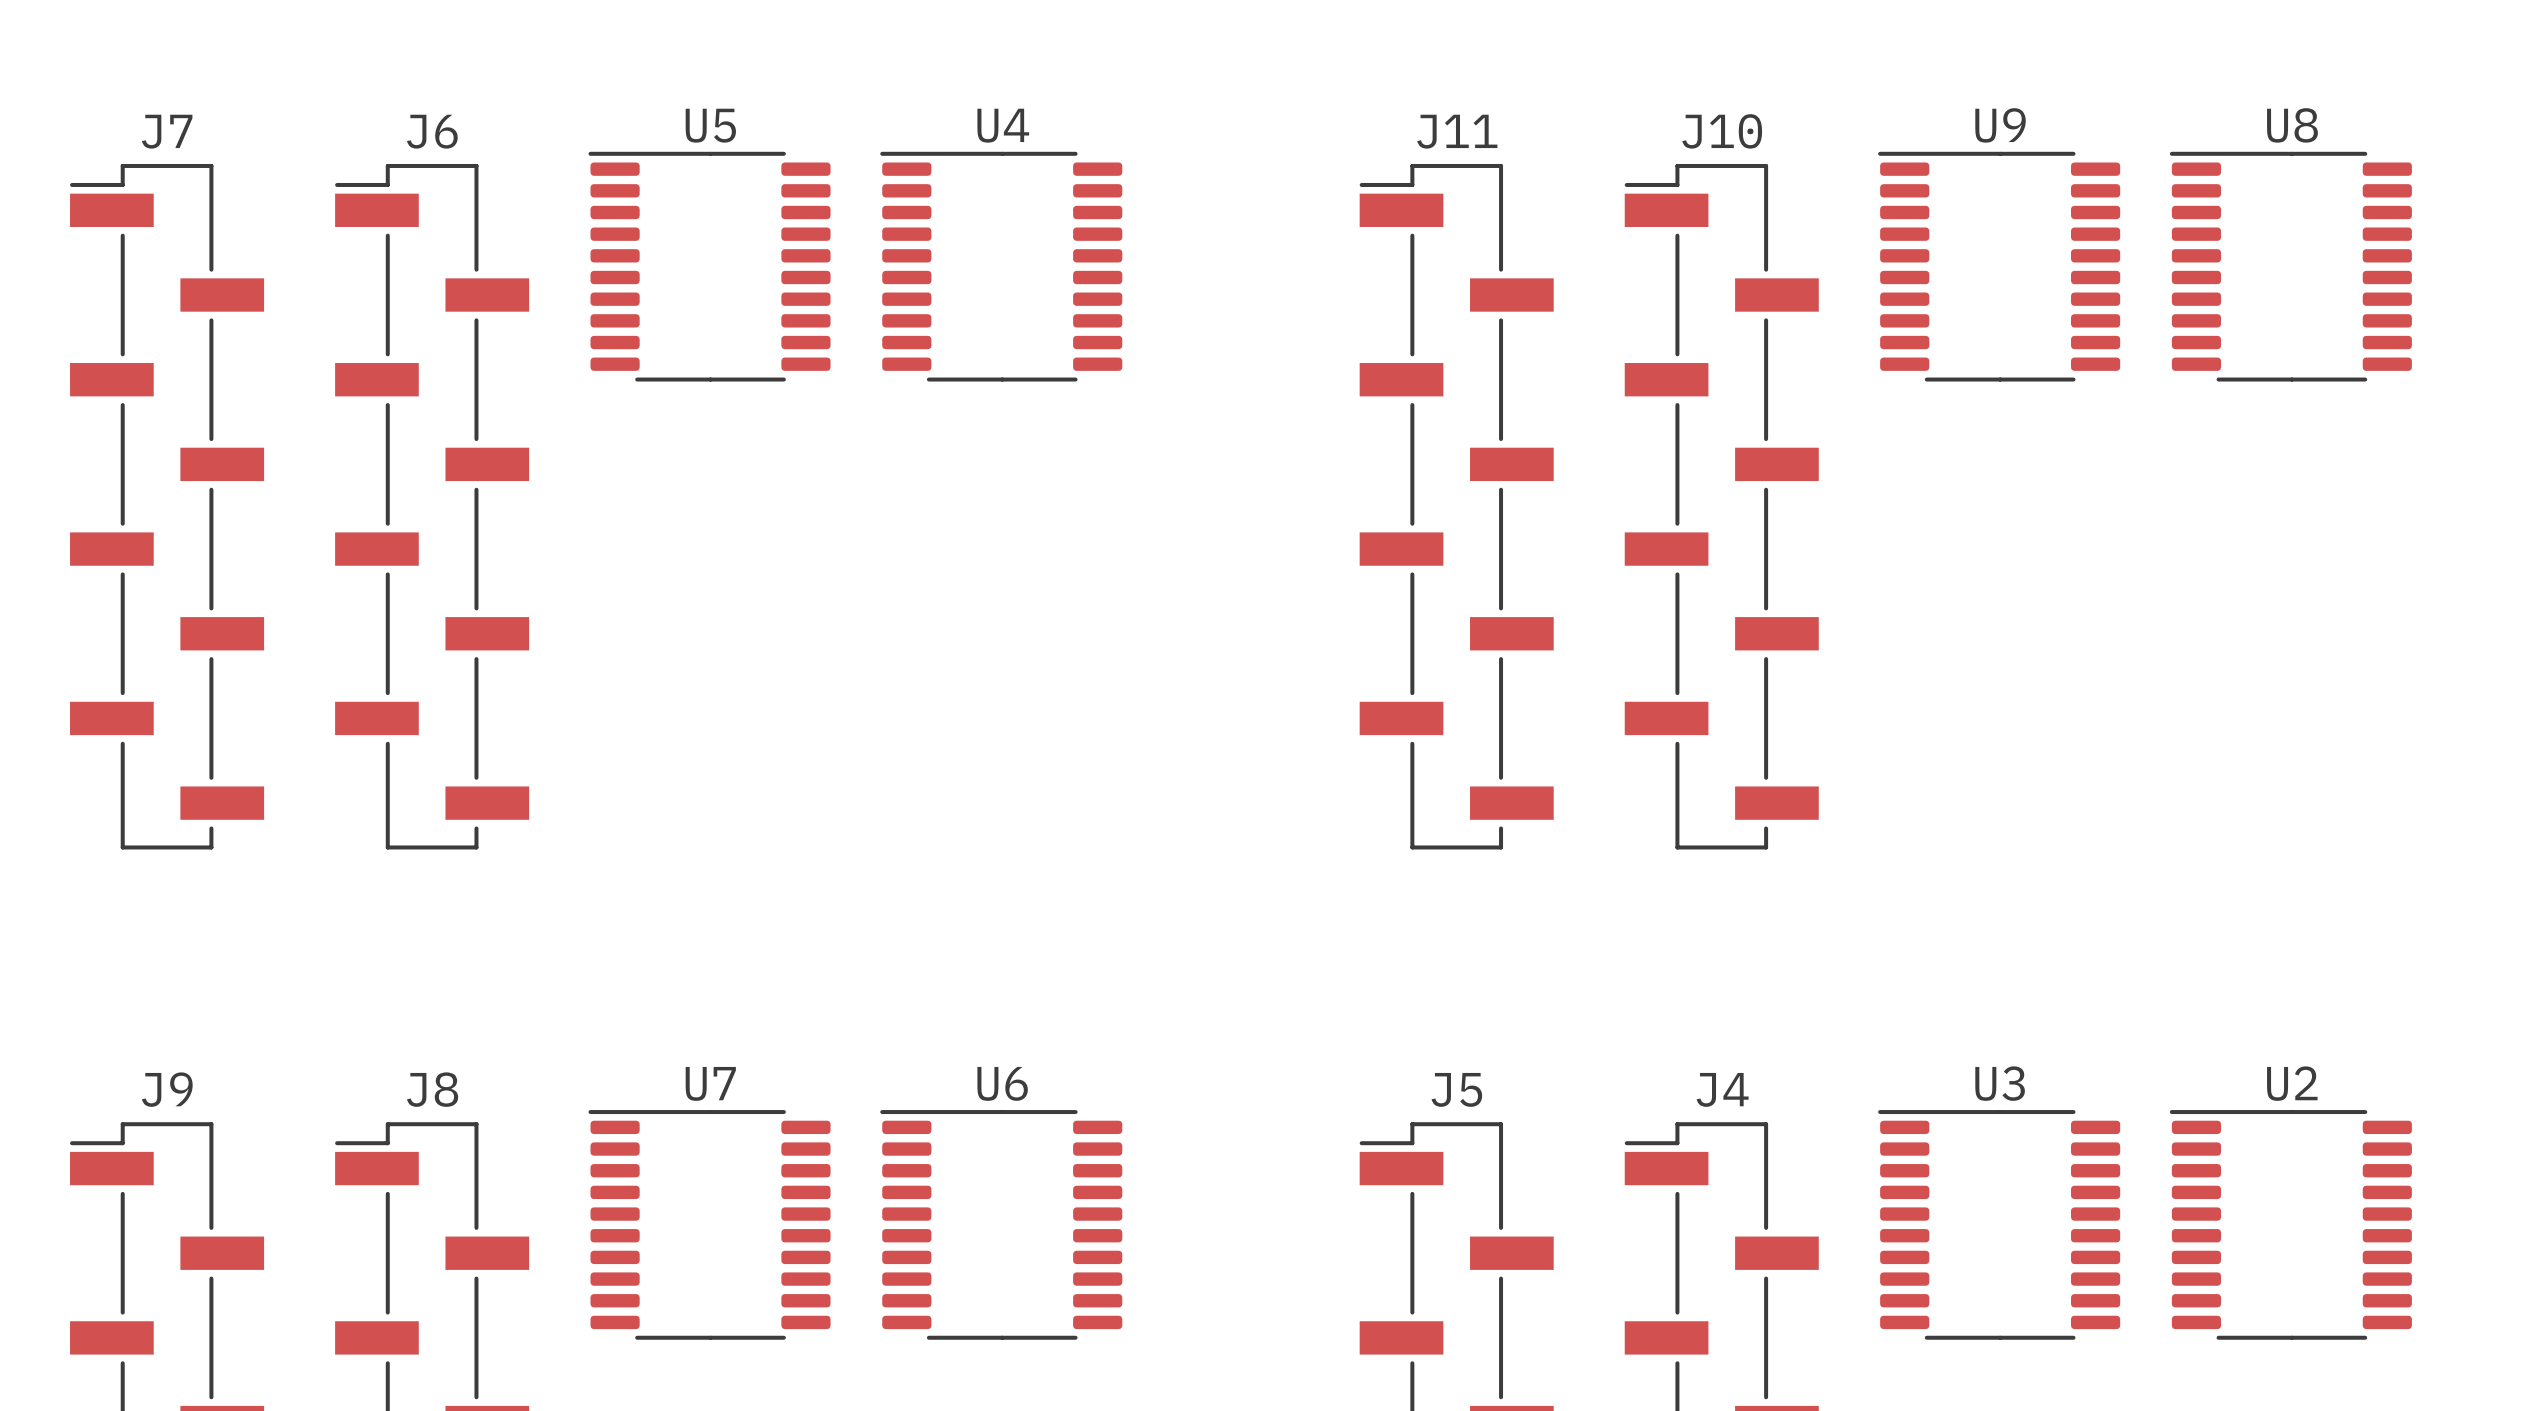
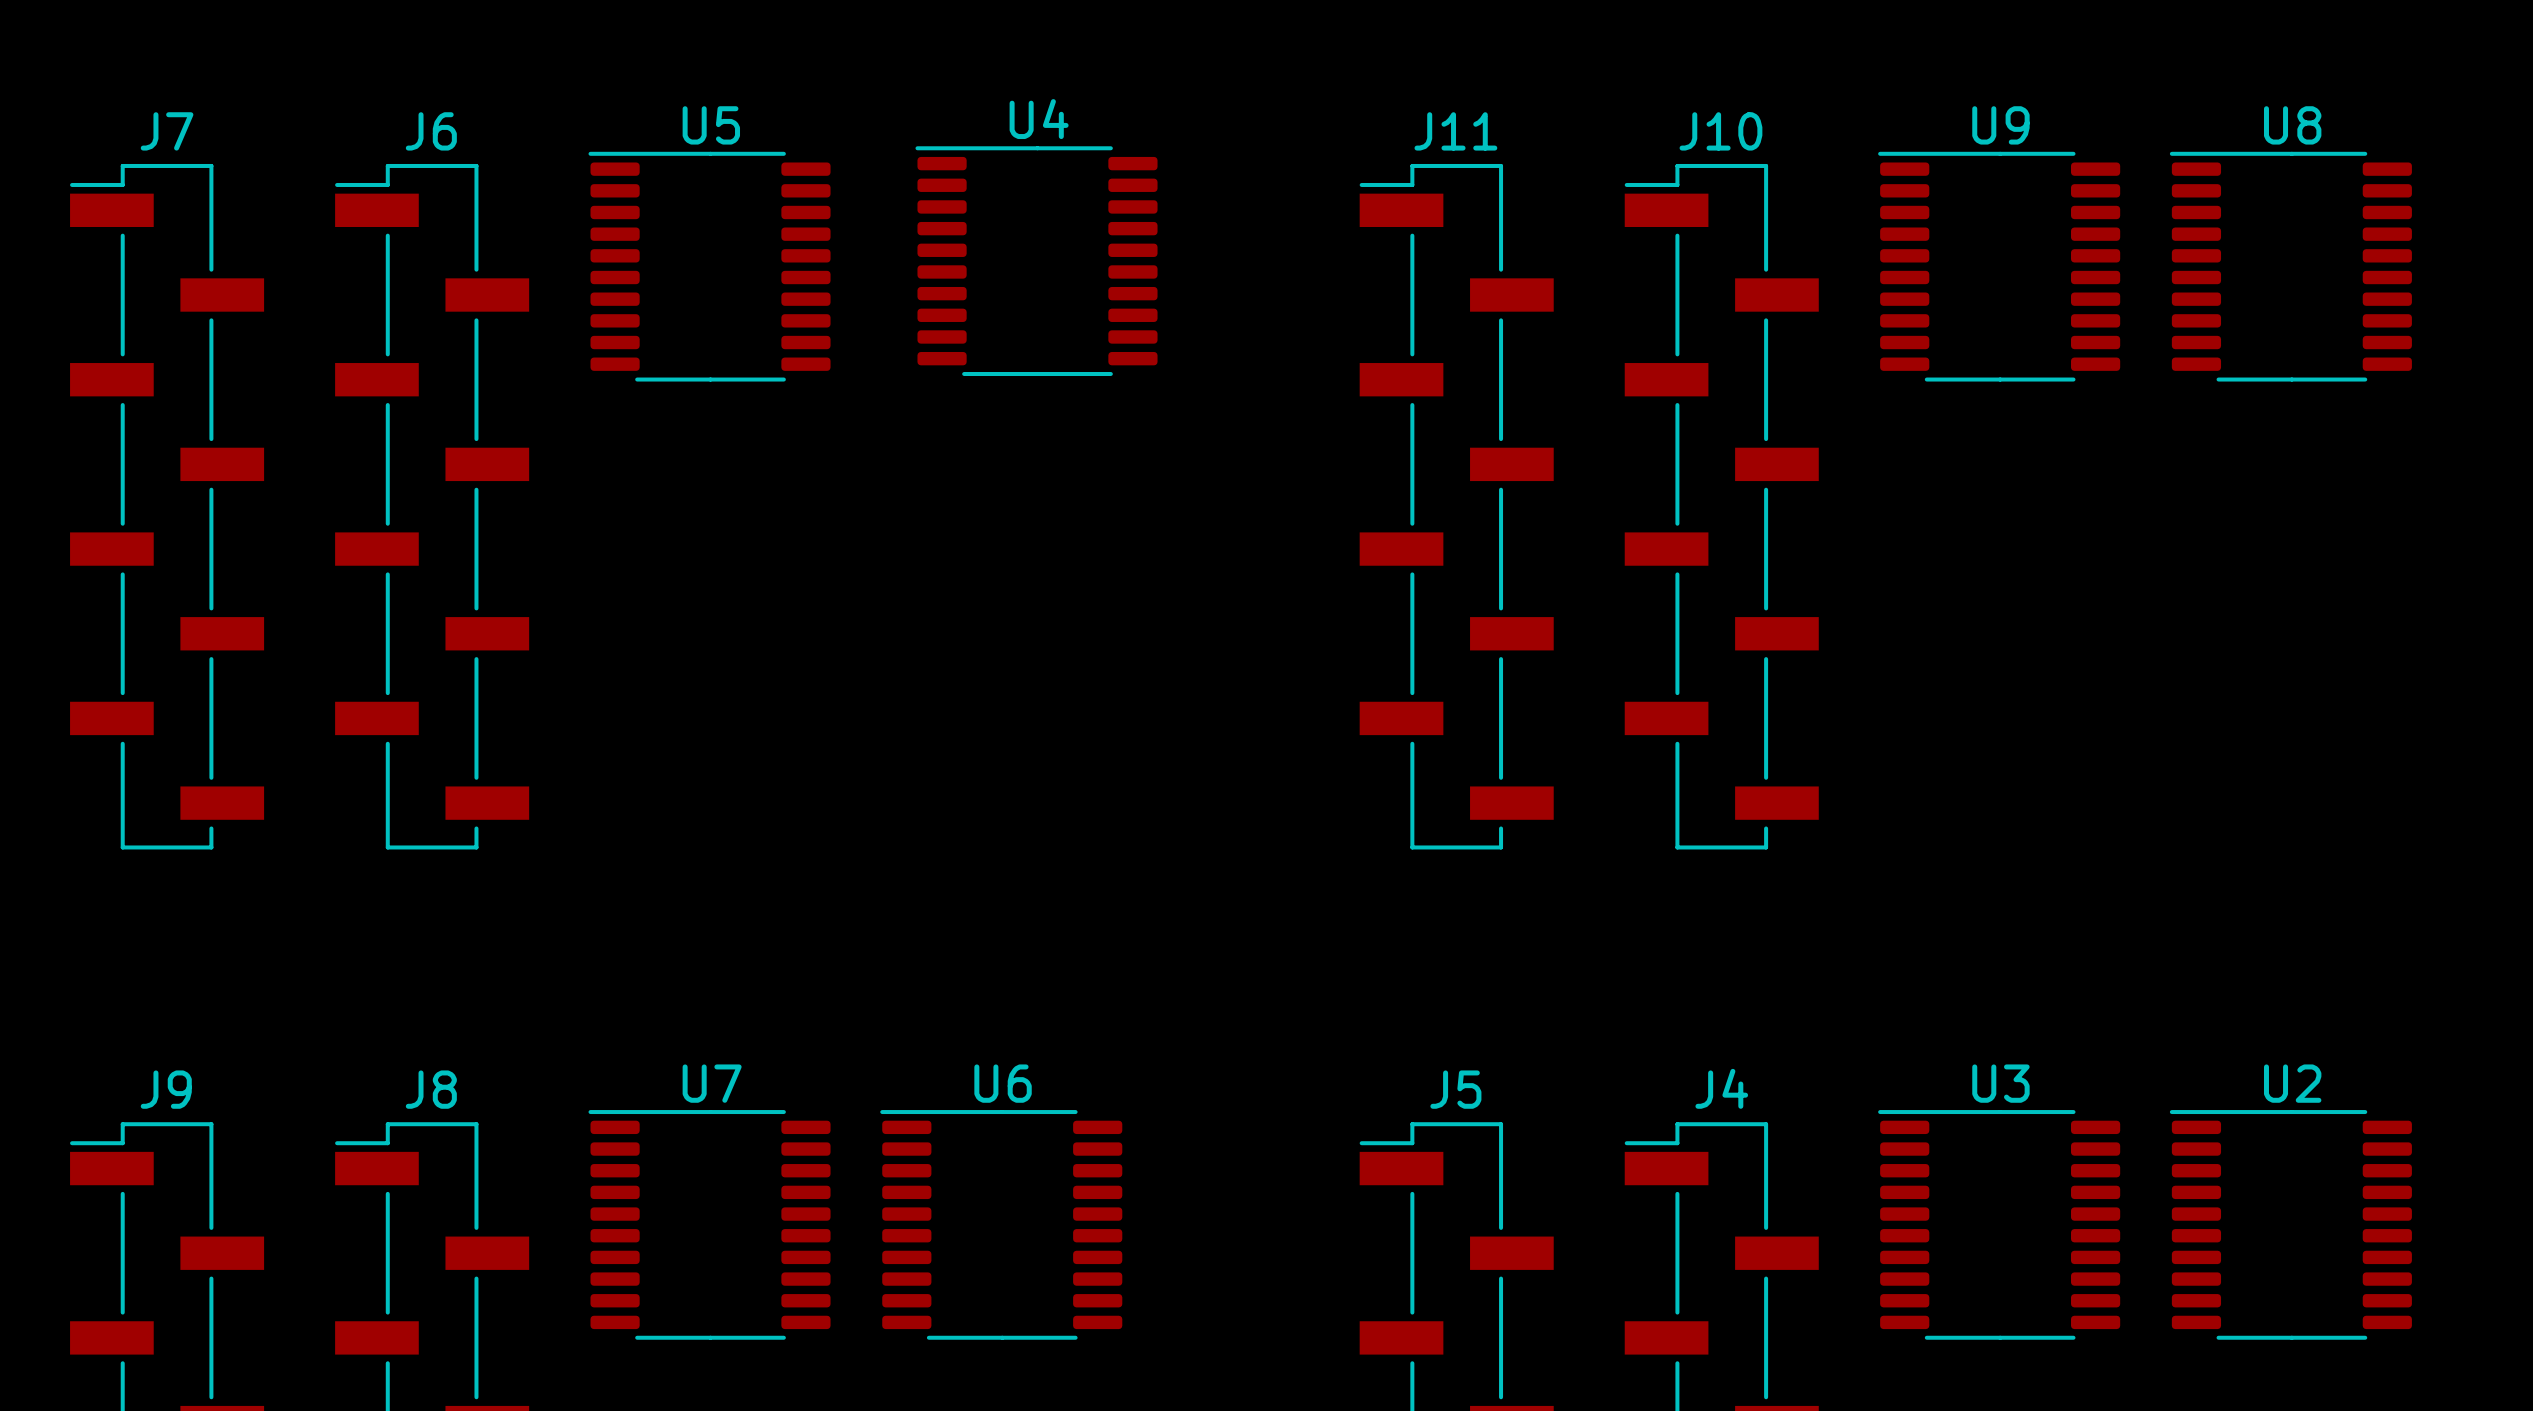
U4 position: (1001, 266) -> (1036, 261)

